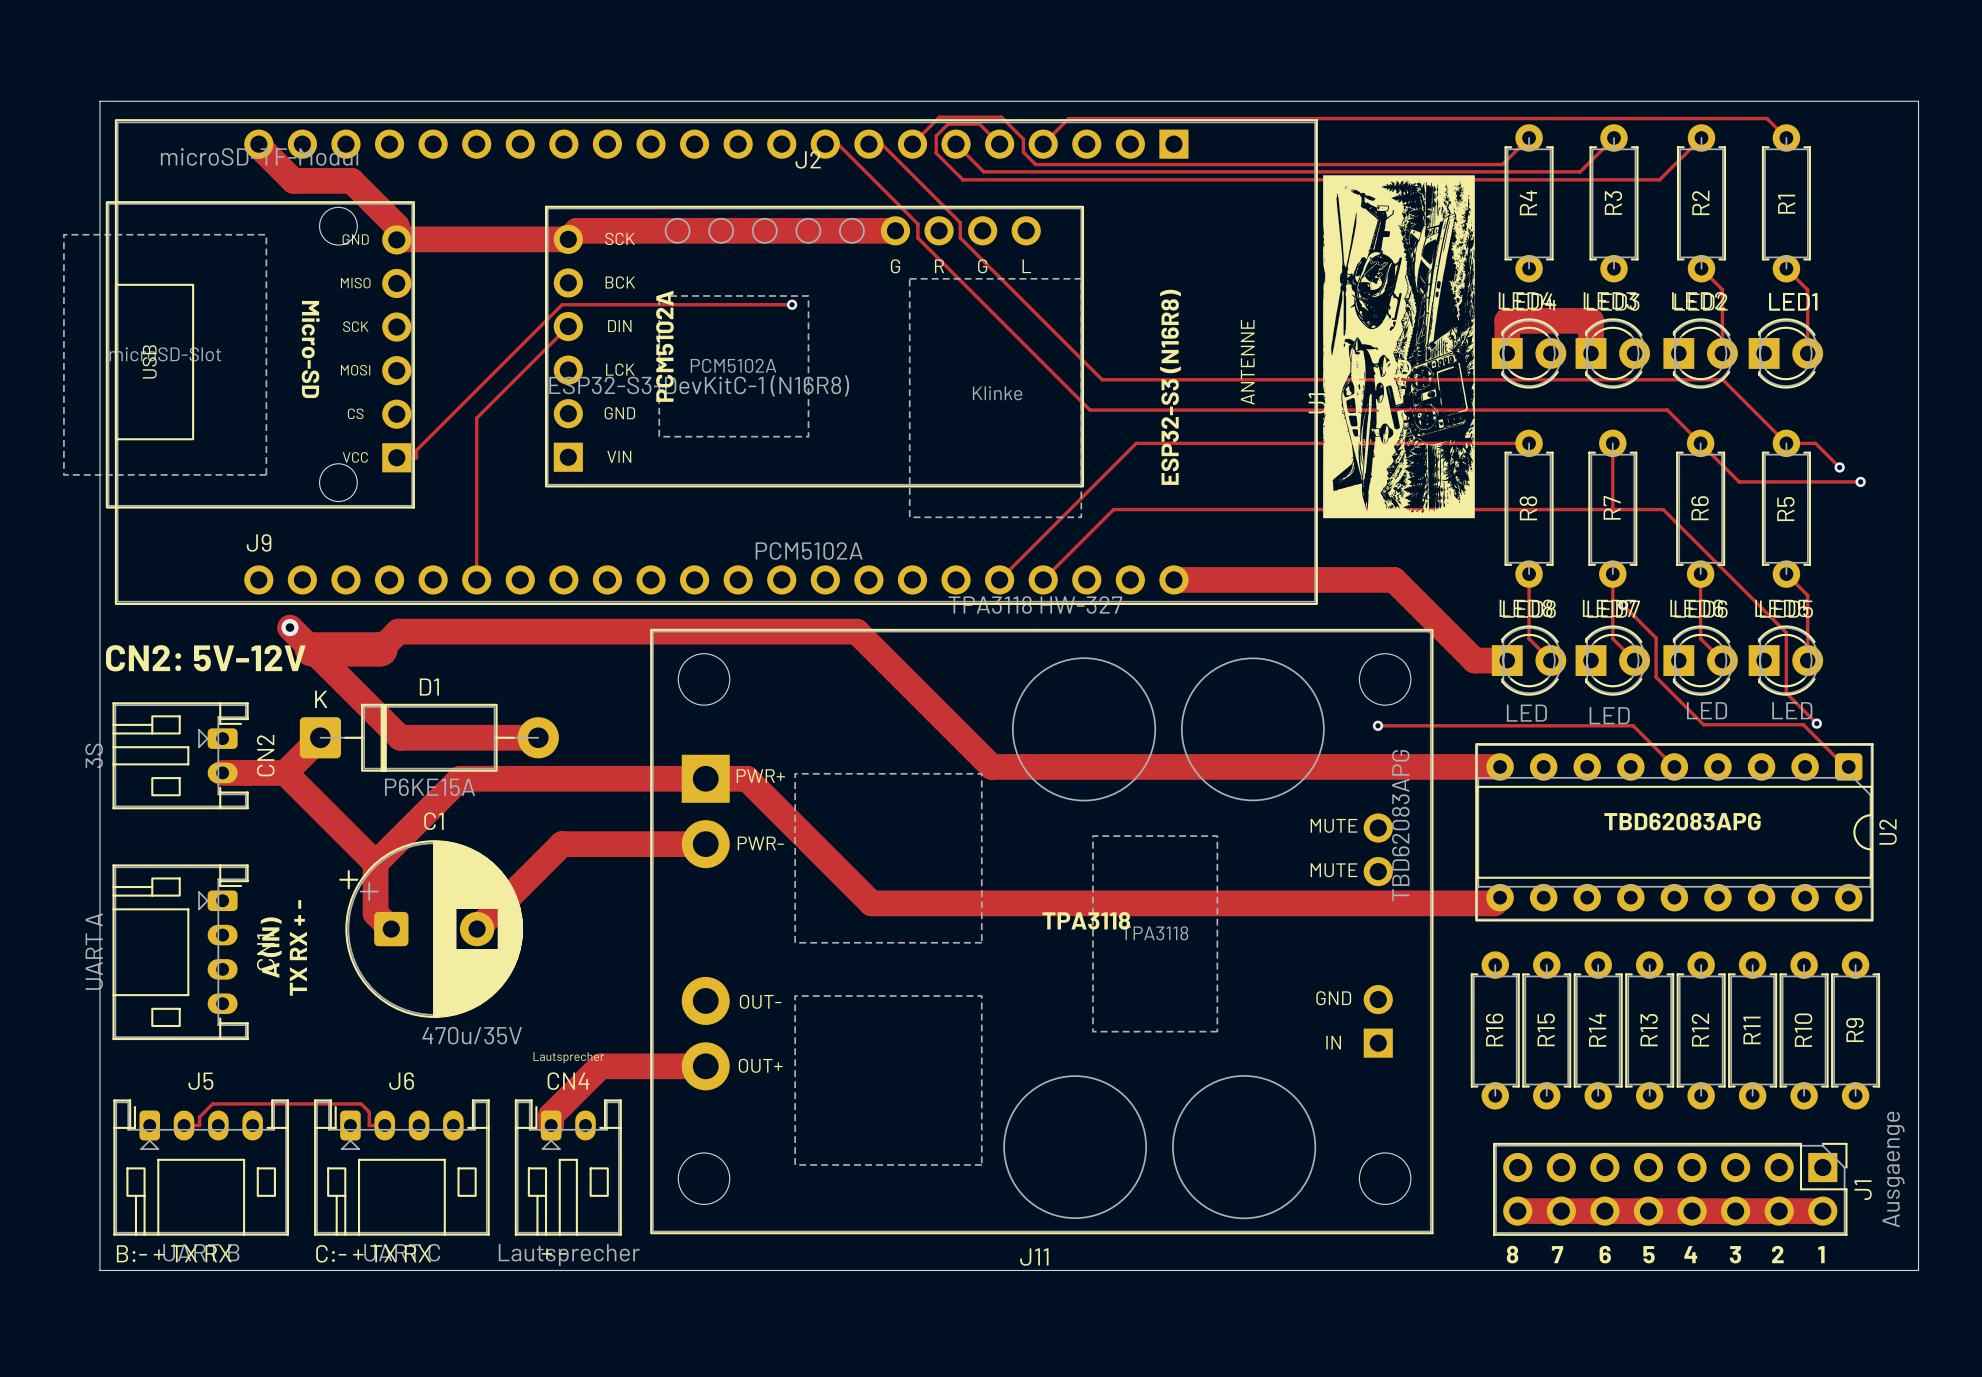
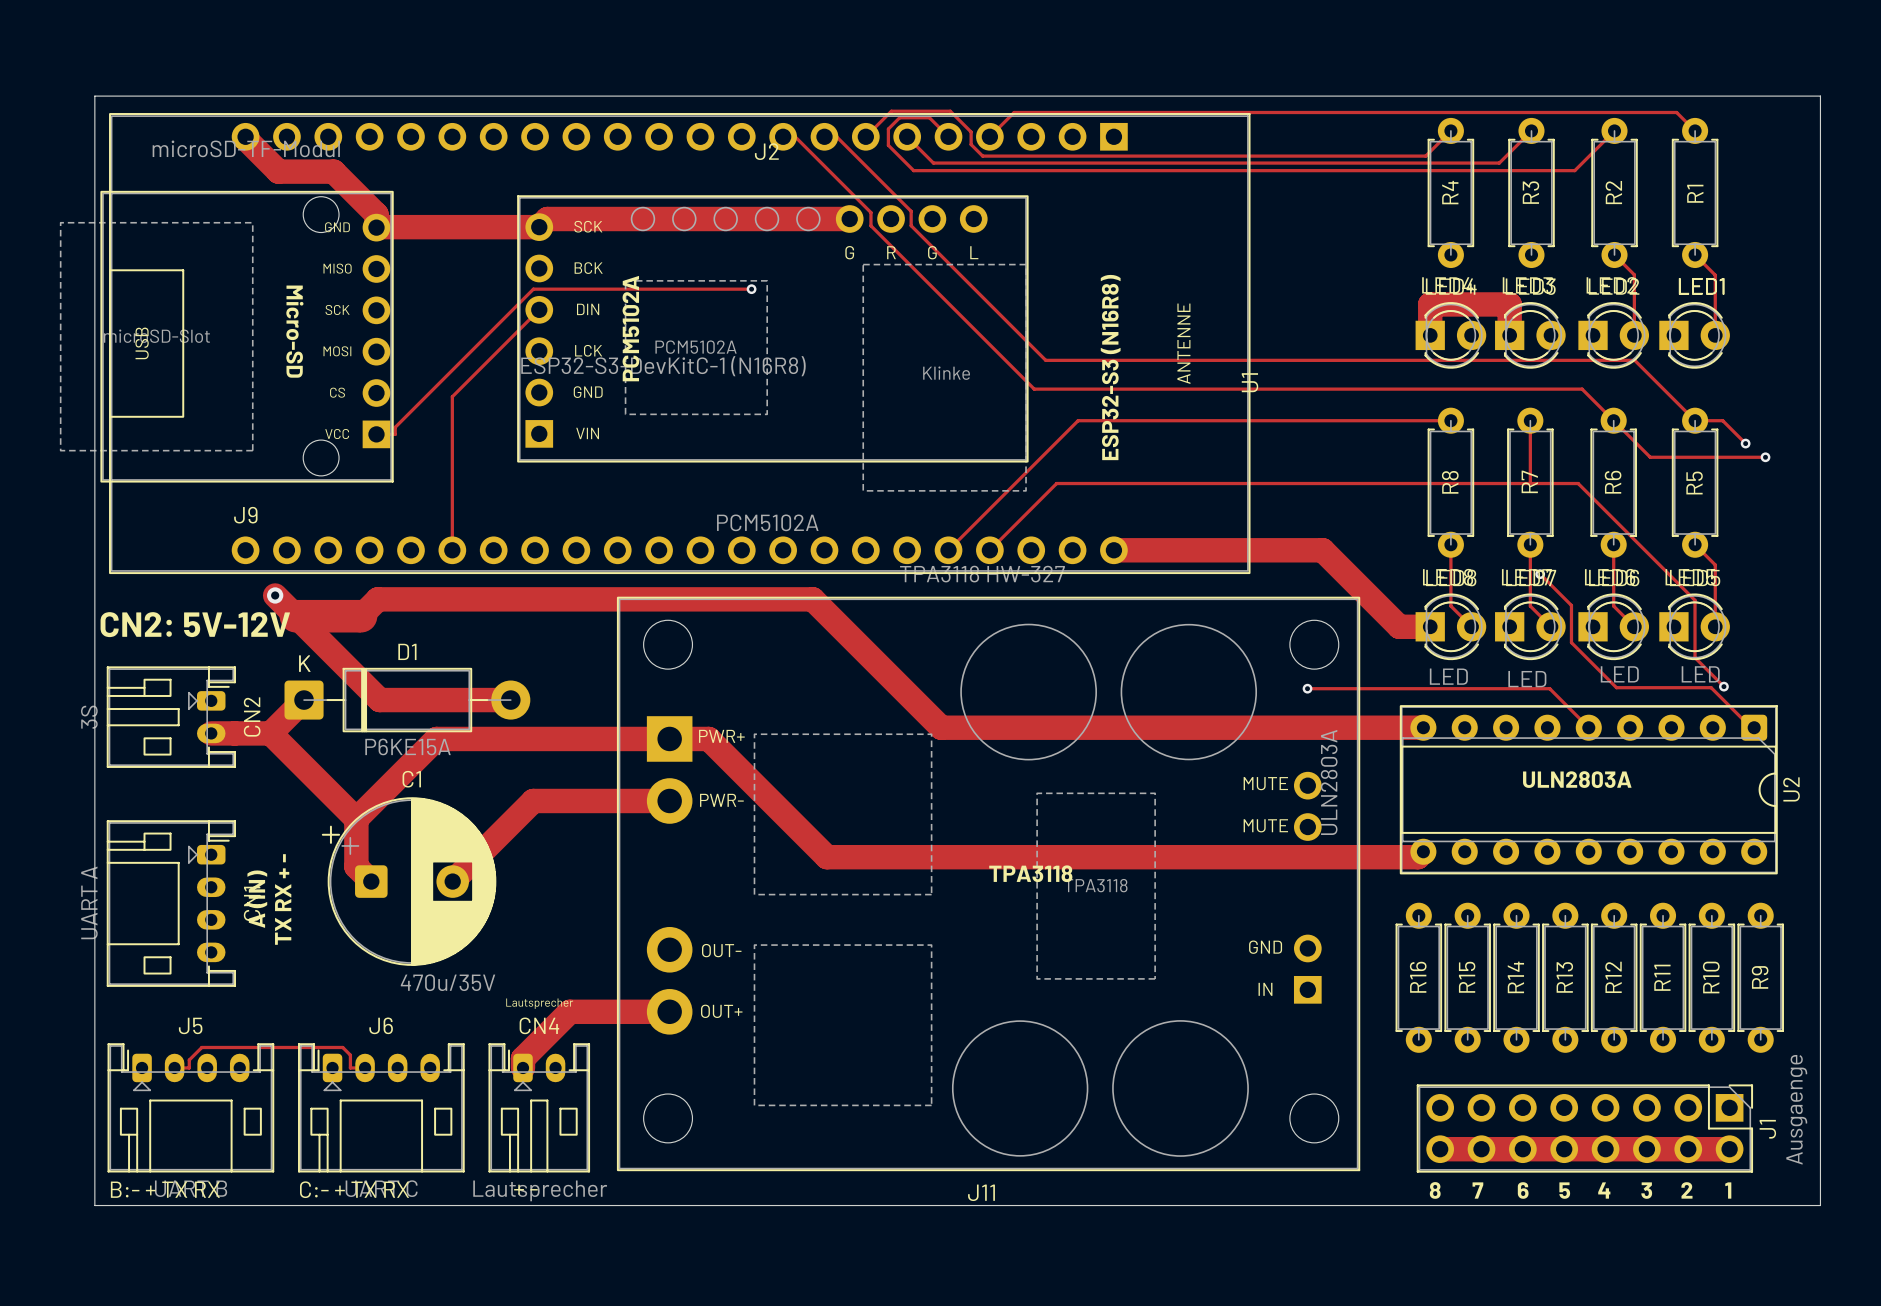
part: (1398, 346) -> none
text: TBD62083APG (1682, 821) -> ULN2803A (1577, 779)
U2 value: TBD62083APG (1400, 825) -> ULN2803A (1329, 782)

